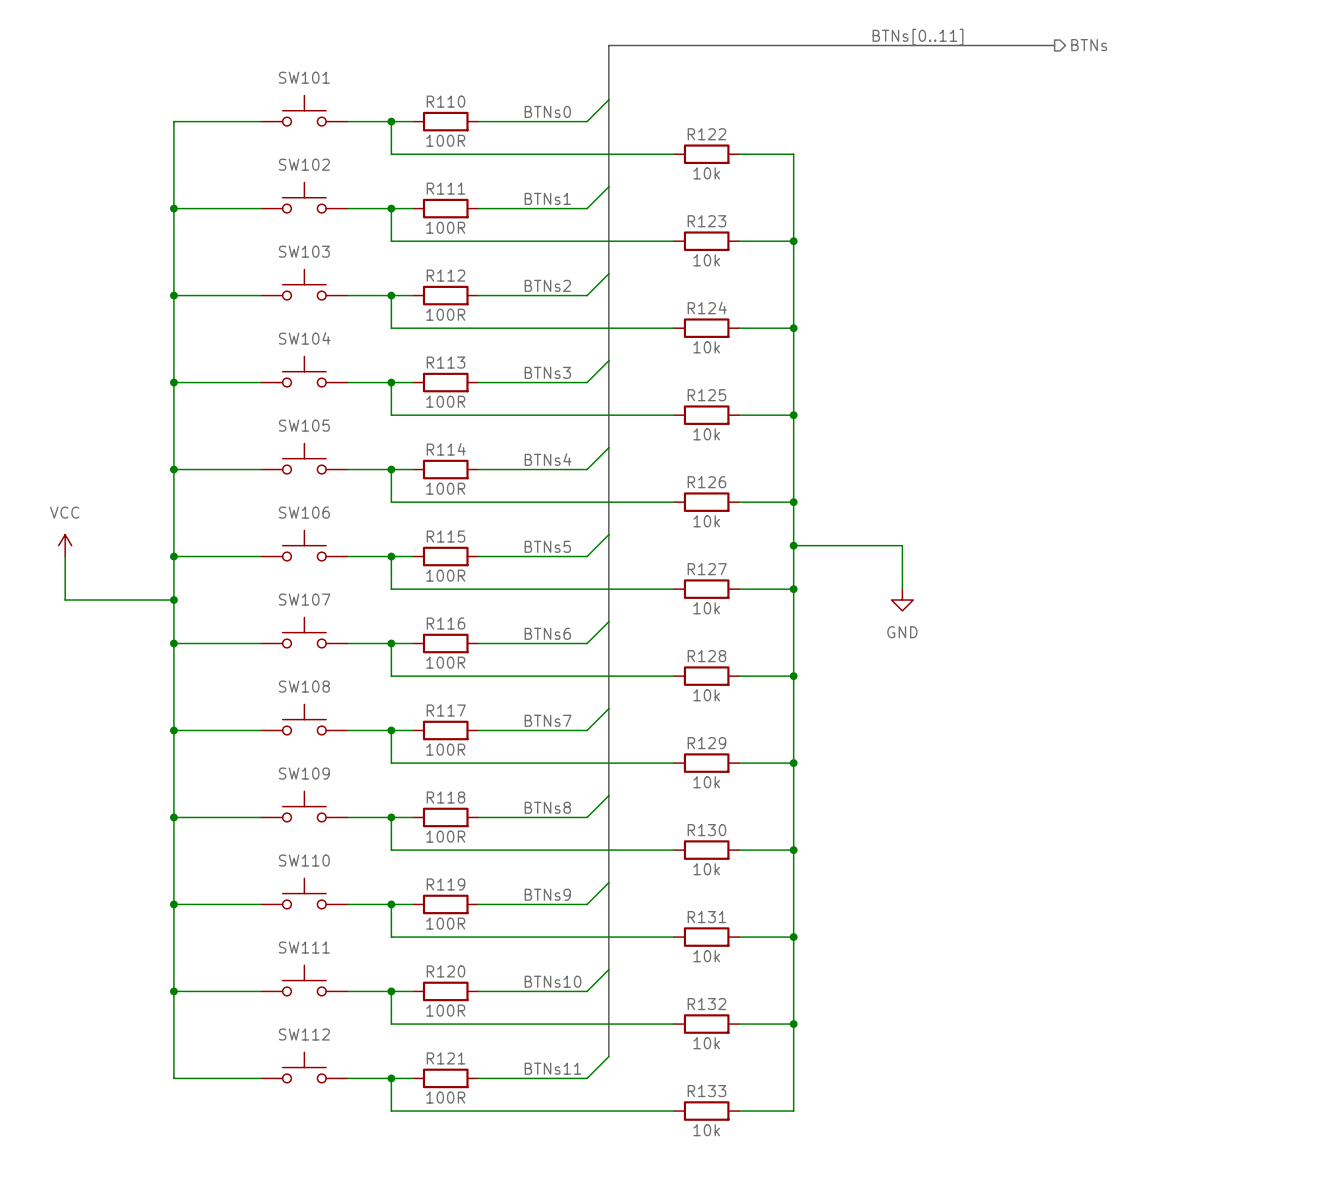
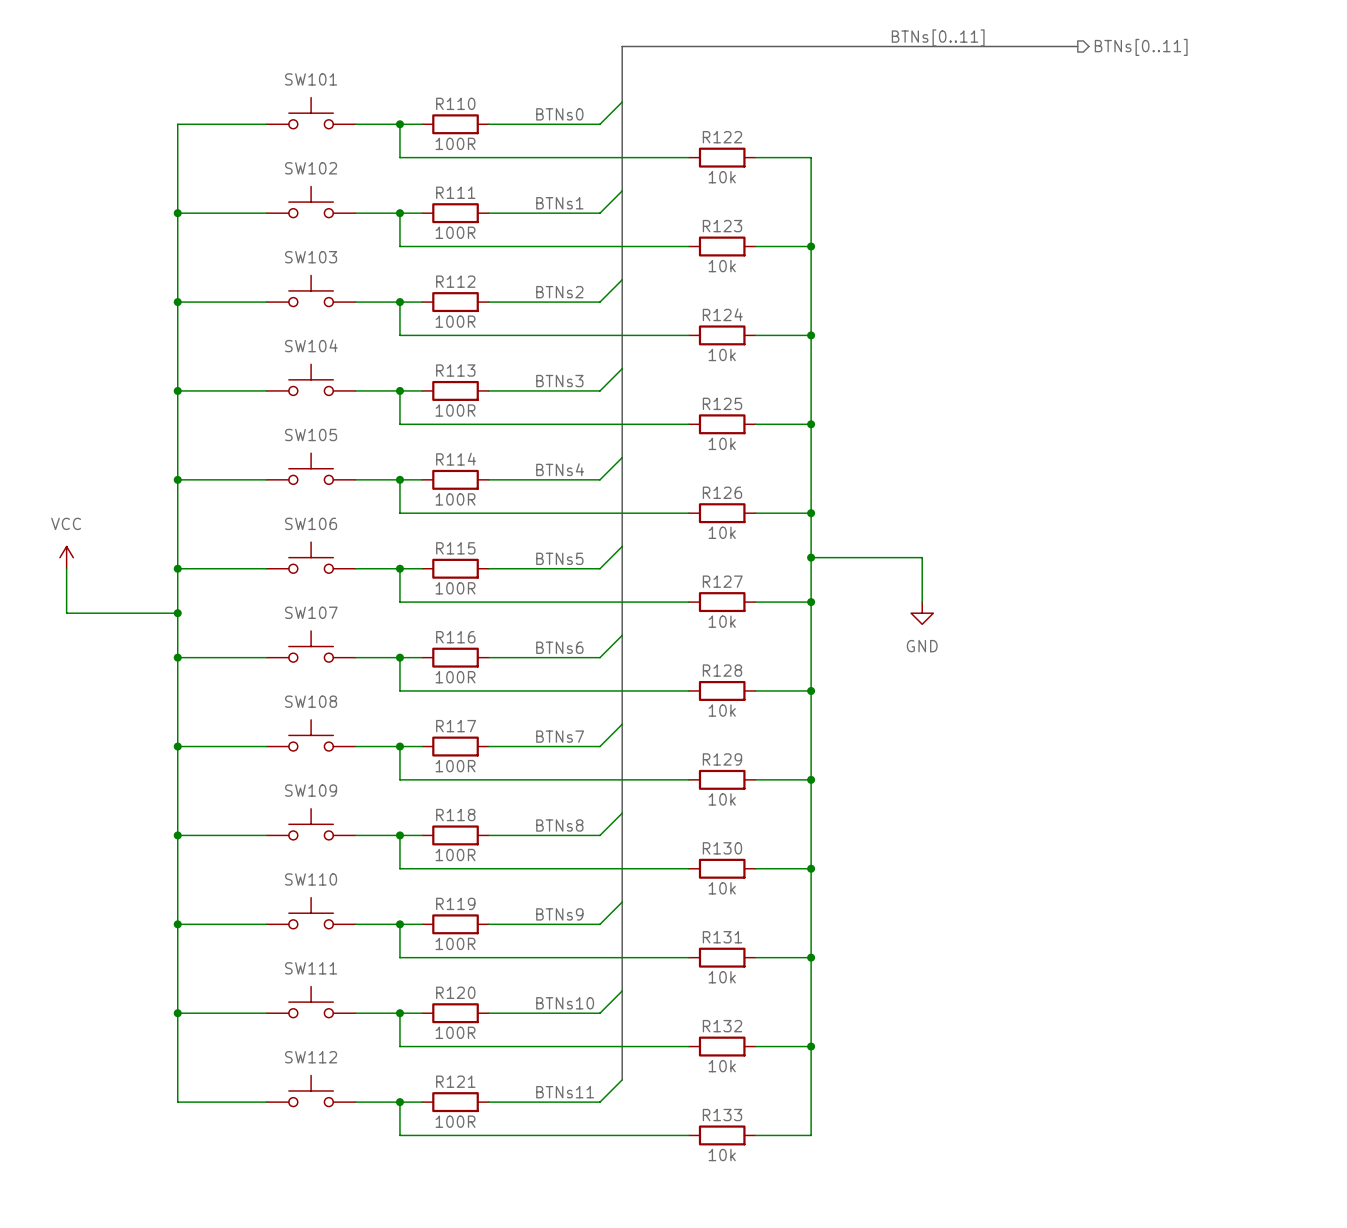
hierarchical label: BTNs (1089, 45) -> BTNs[0..11] (1141, 47)

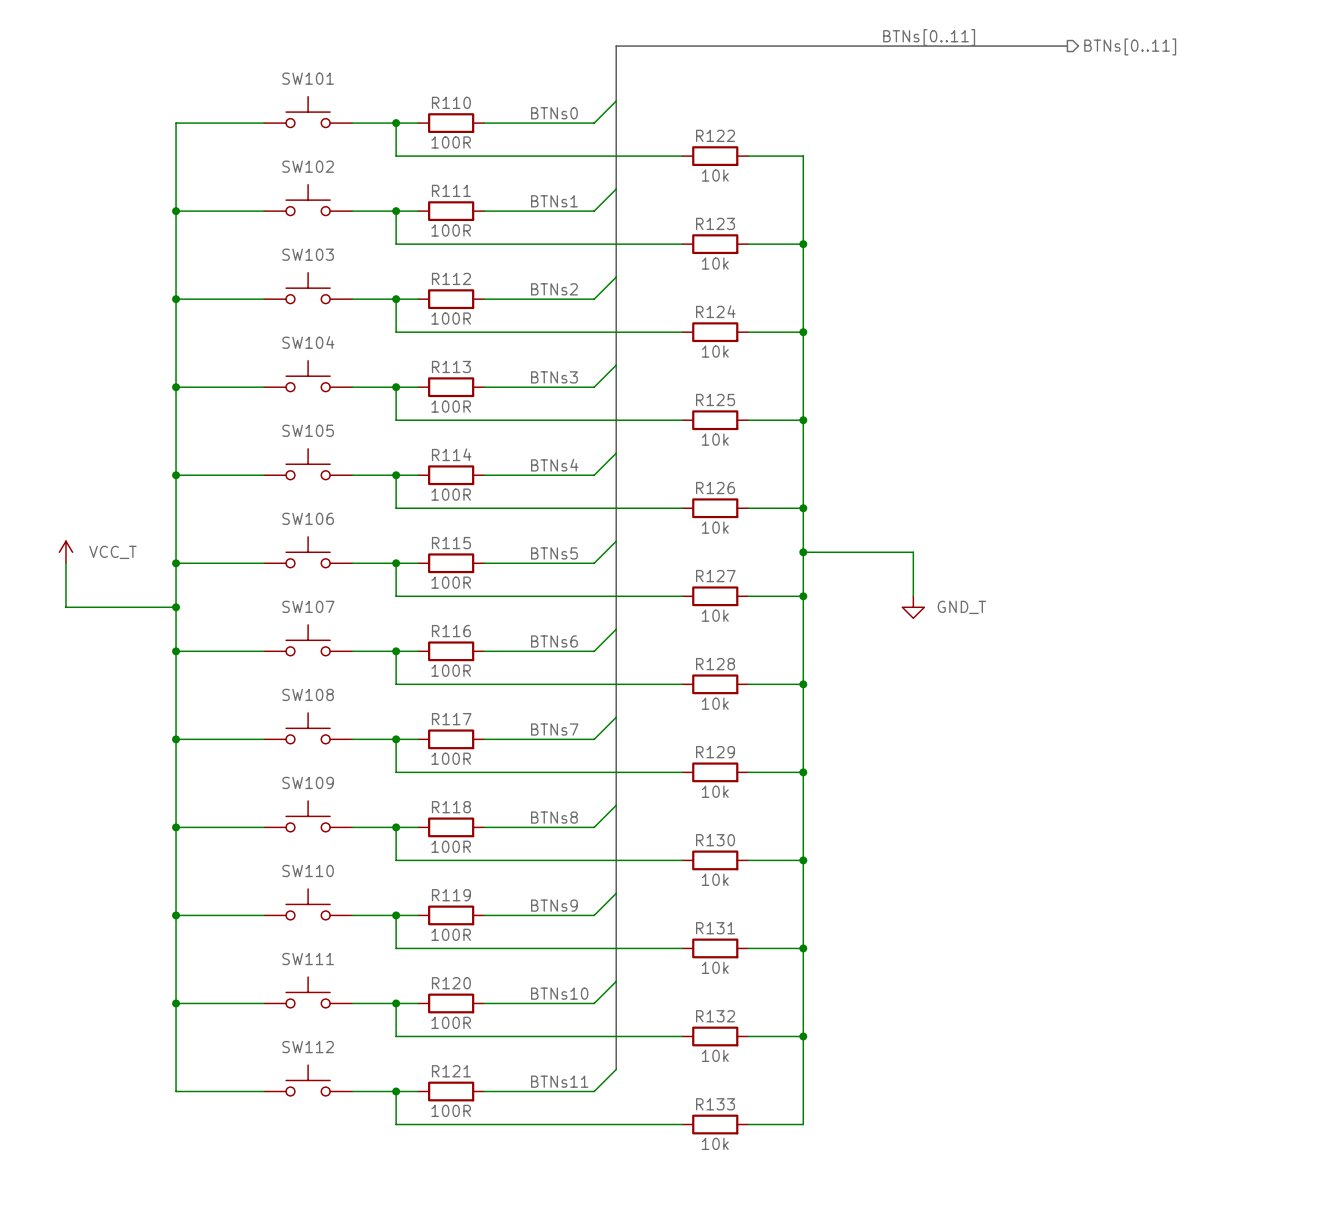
power symbol: VCC (66, 557) -> VCC_T (65, 552)
power symbol: GND (922, 613) -> GND_T (913, 607)

